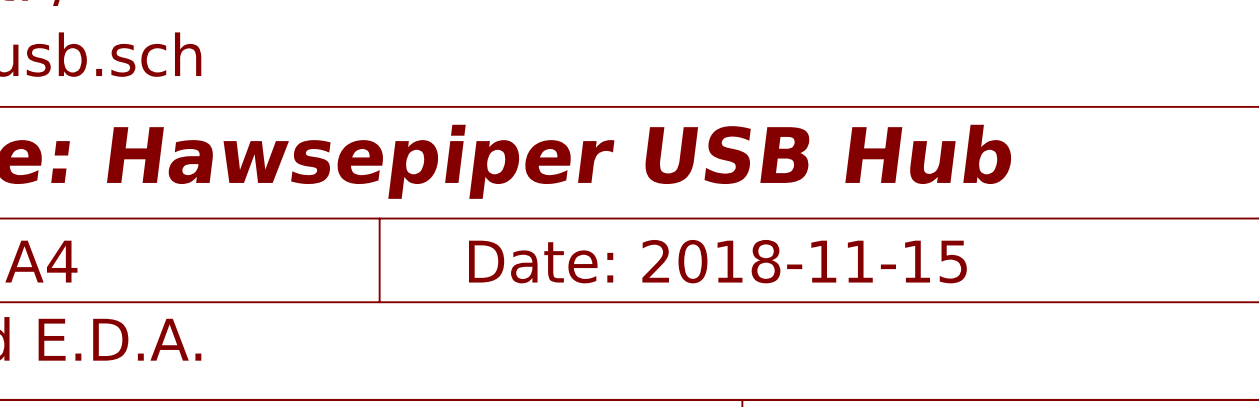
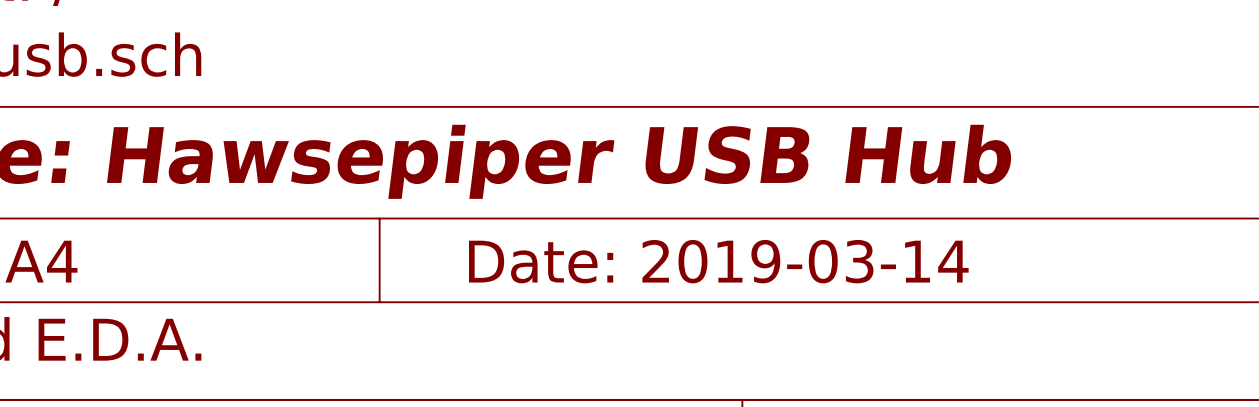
title block: Date: 2018-11-15 (717, 261) -> Date: 2019-03-14 (718, 261)

